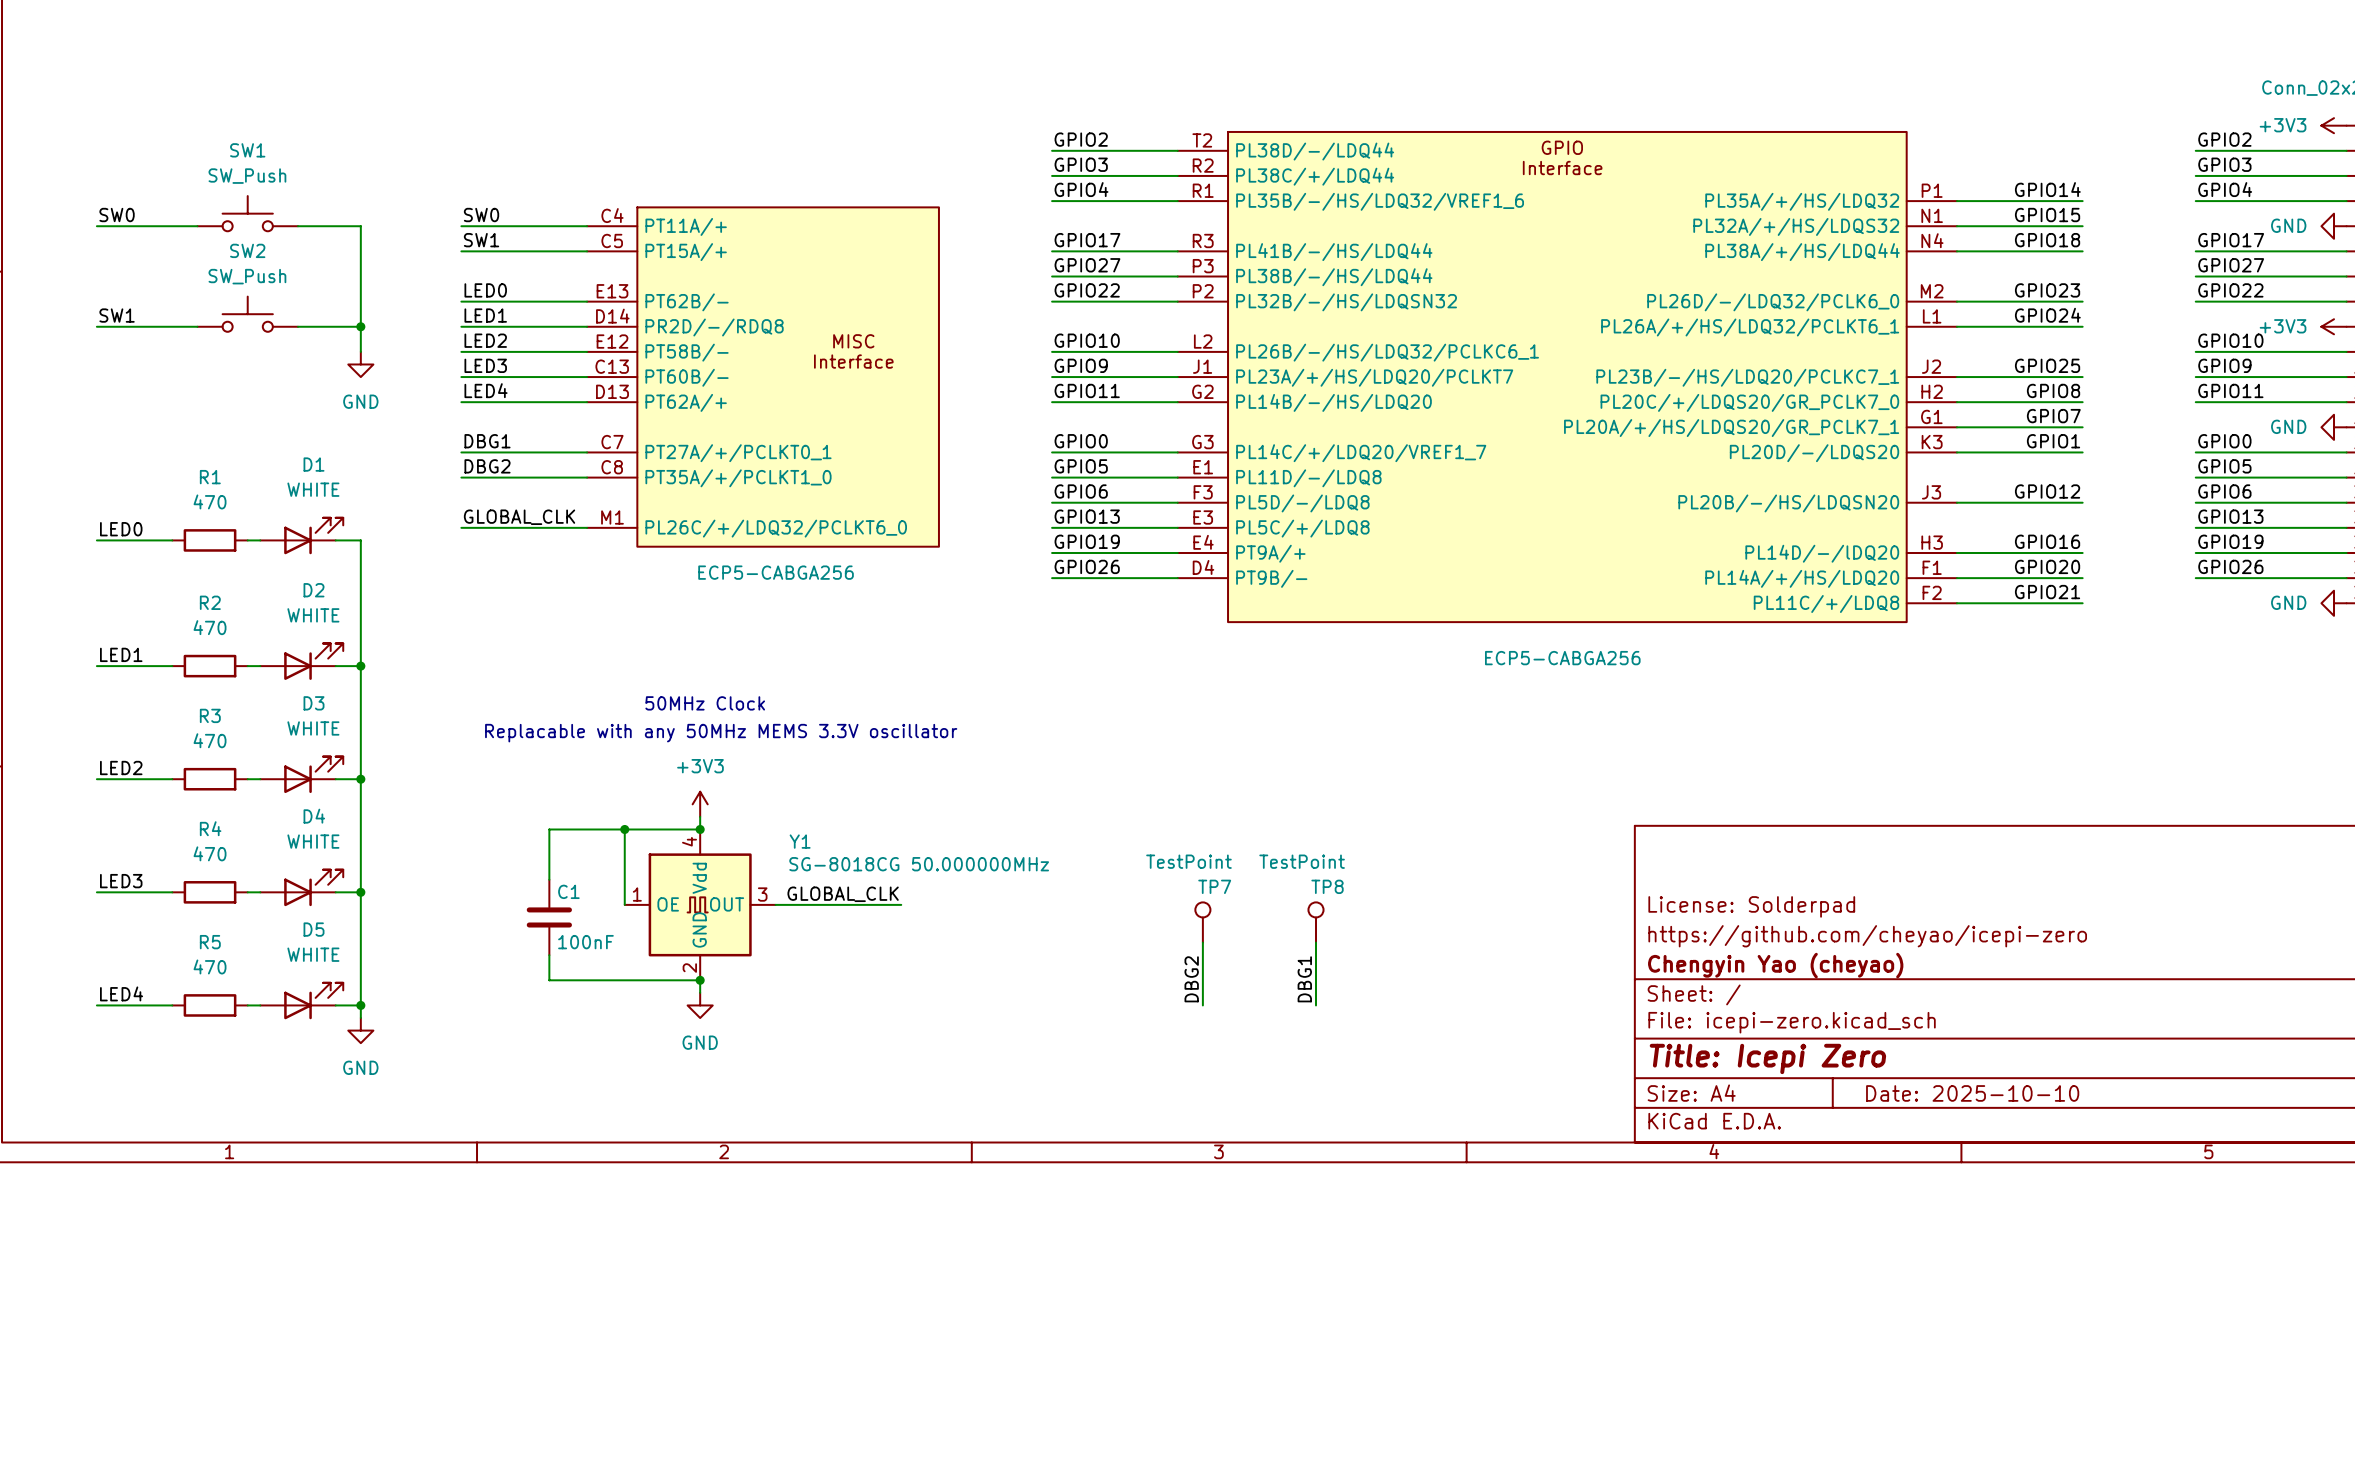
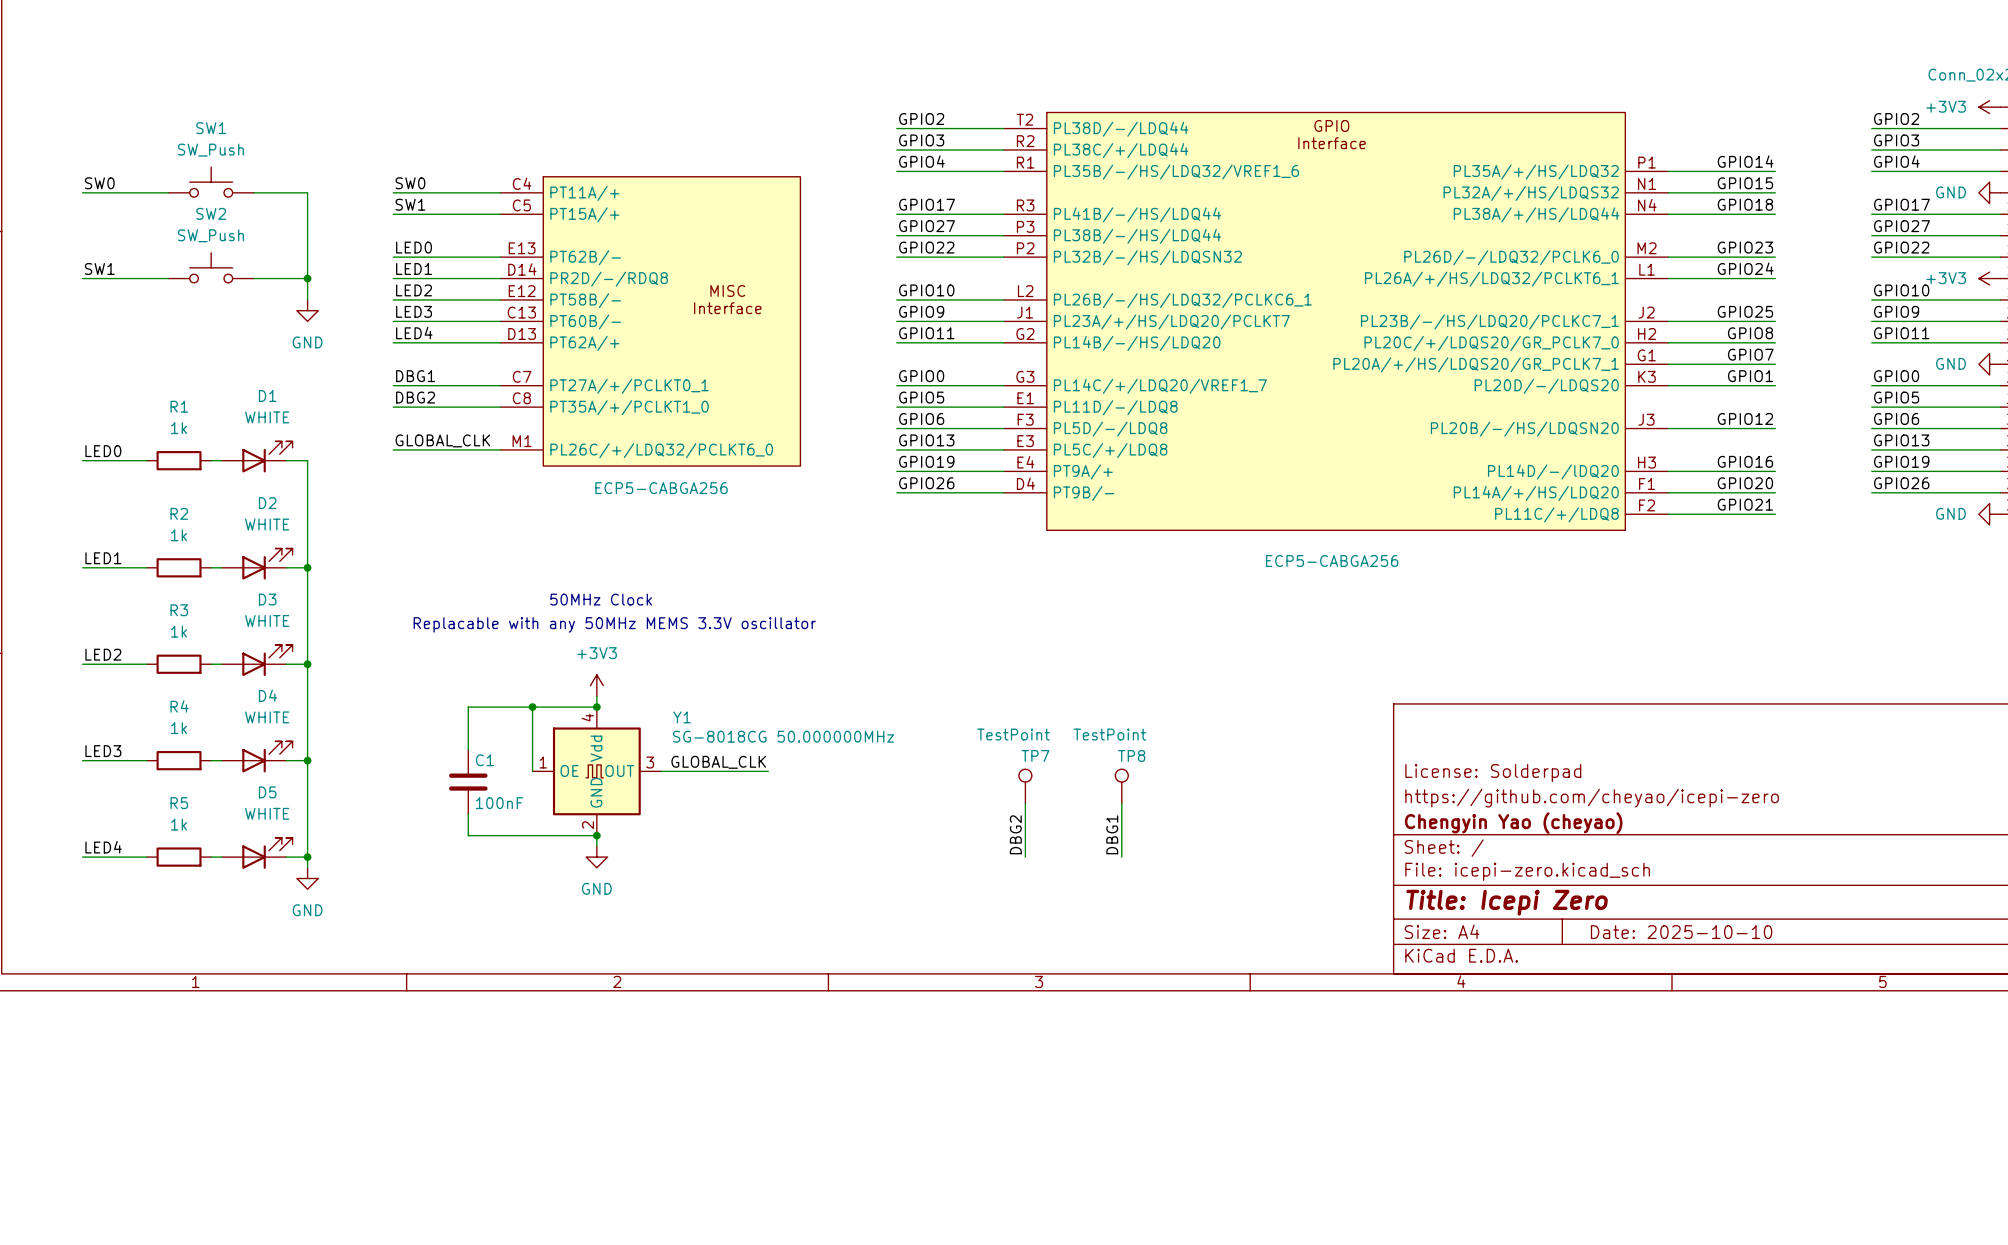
R1 value: 470 (210, 501) -> 1k (179, 428)
R2 value: 470 (210, 627) -> 1k (179, 535)
R3 value: 470 (210, 740) -> 1k (179, 631)
R4 value: 470 (210, 853) -> 1k (179, 728)
R5 value: 470 (210, 966) -> 1k (179, 824)

